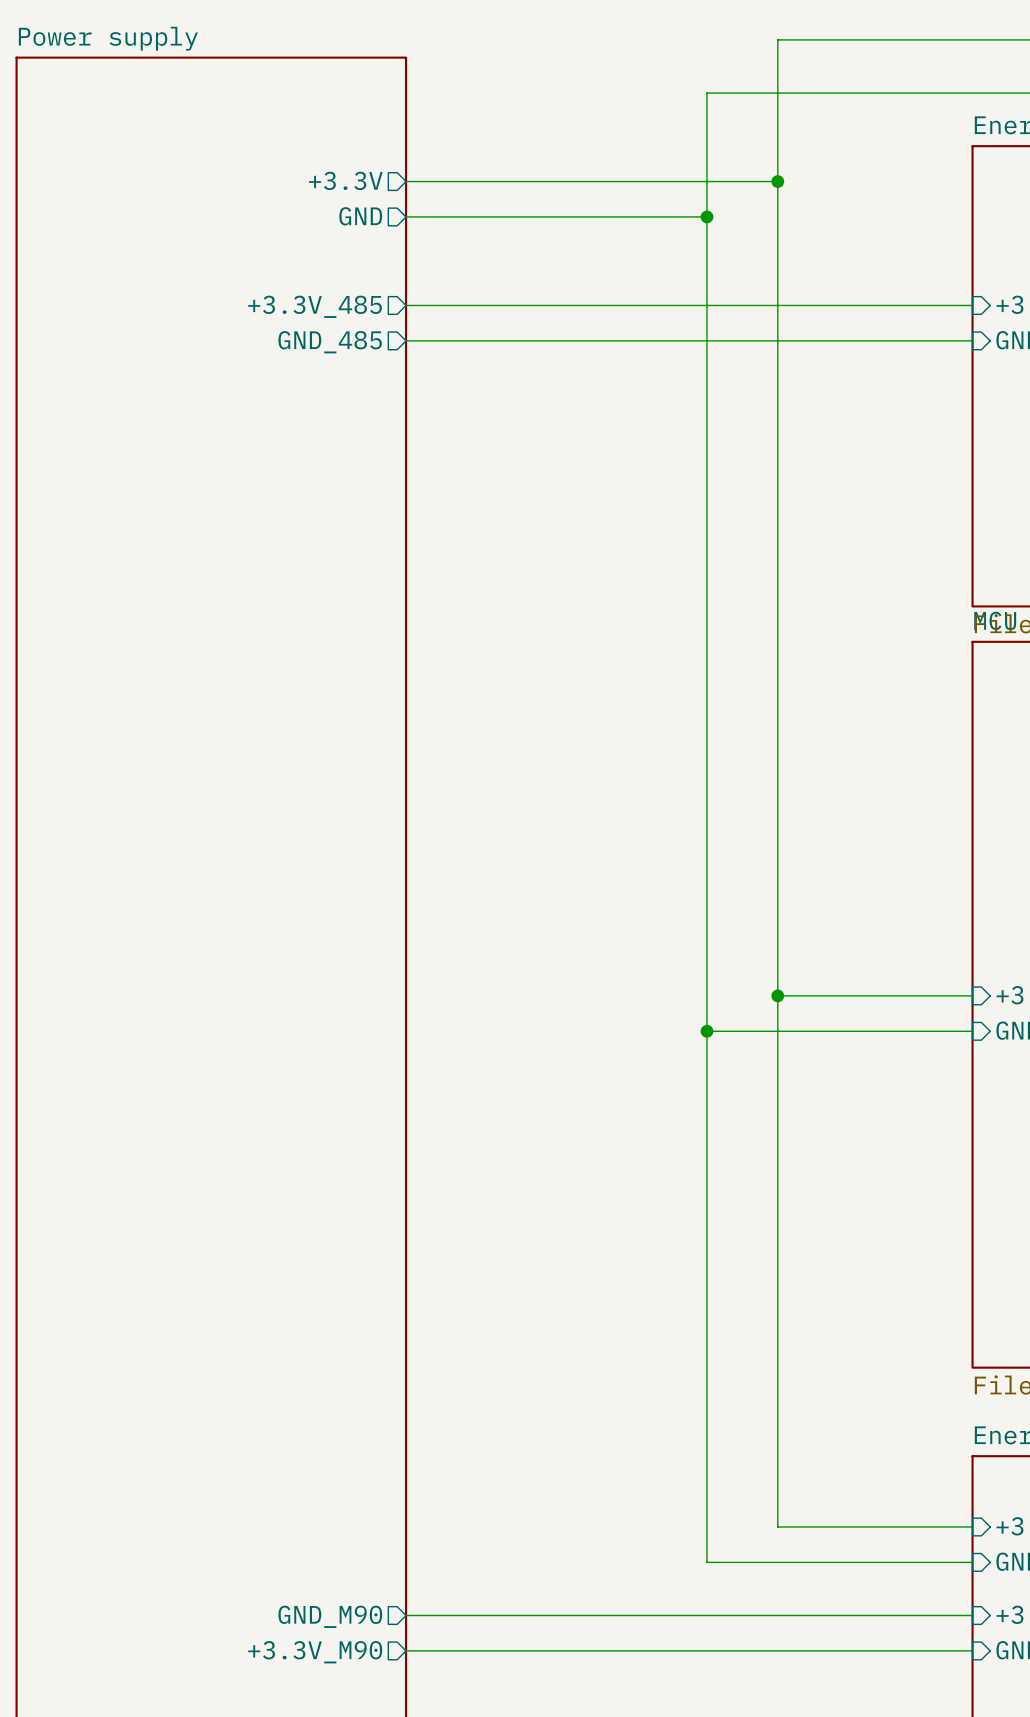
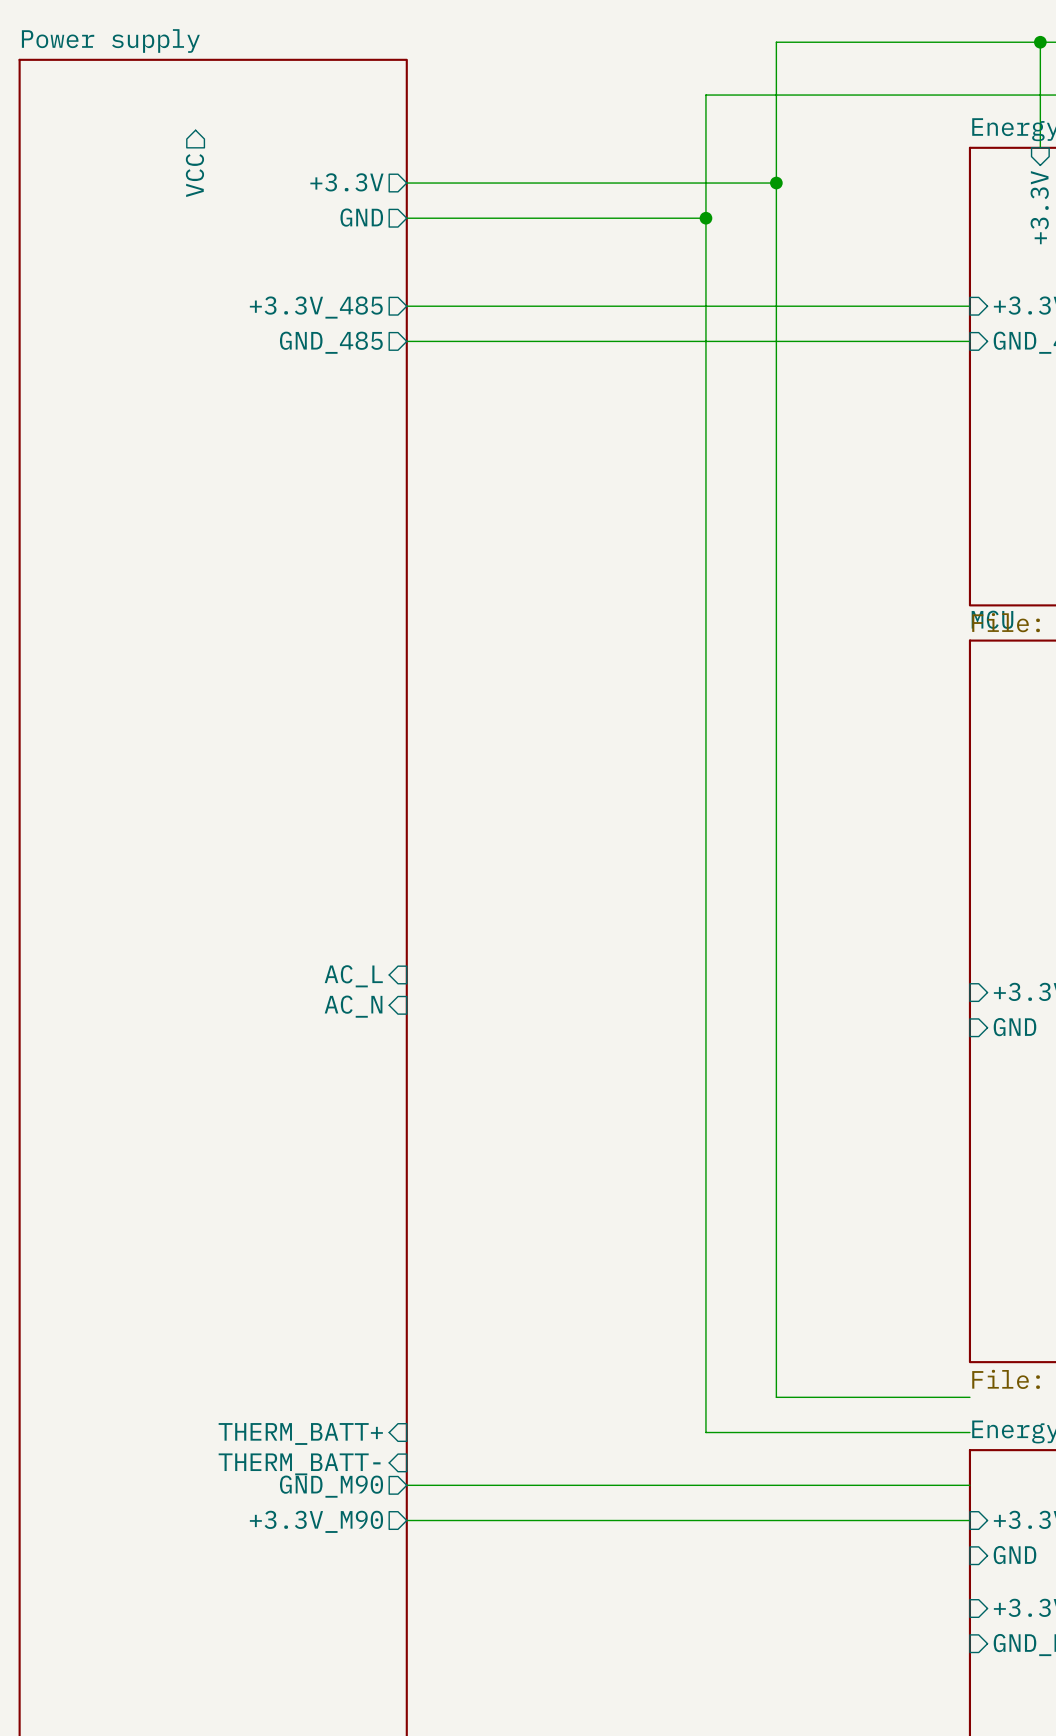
sheet pin: none -> VCC (194, 175)
sheet pin: none -> AC_L (353, 976)
wire: (777, 995) (972, 995) -> none
junction: (777, 995) -> none
sheet pin: none -> AC_N (353, 1006)
wire: (706, 1031) (972, 1031) -> none
junction: (706, 1031) -> none
wire: (777, 1403) (777, 1526) -> (776, 1397) (969, 1397)
wire: (706, 1438) (706, 1562) (972, 1562) -> (705, 1432) (969, 1432)
sheet pin: none -> THERM_BATT+ (300, 1433)
sheet pin: none -> THERM_BATT- (299, 1464)
wire: none -> (406, 1520) (776, 1520)
wire: (406, 1615) (972, 1615) -> (406, 1485) (969, 1485)
sheet pin position: GND_M90 (330, 1616) -> GND_M90 (331, 1486)
wire: (406, 1650) (972, 1650) -> none
sheet pin position: +3.3V_M90 (315, 1652) -> +3.3V_M90 (316, 1521)

